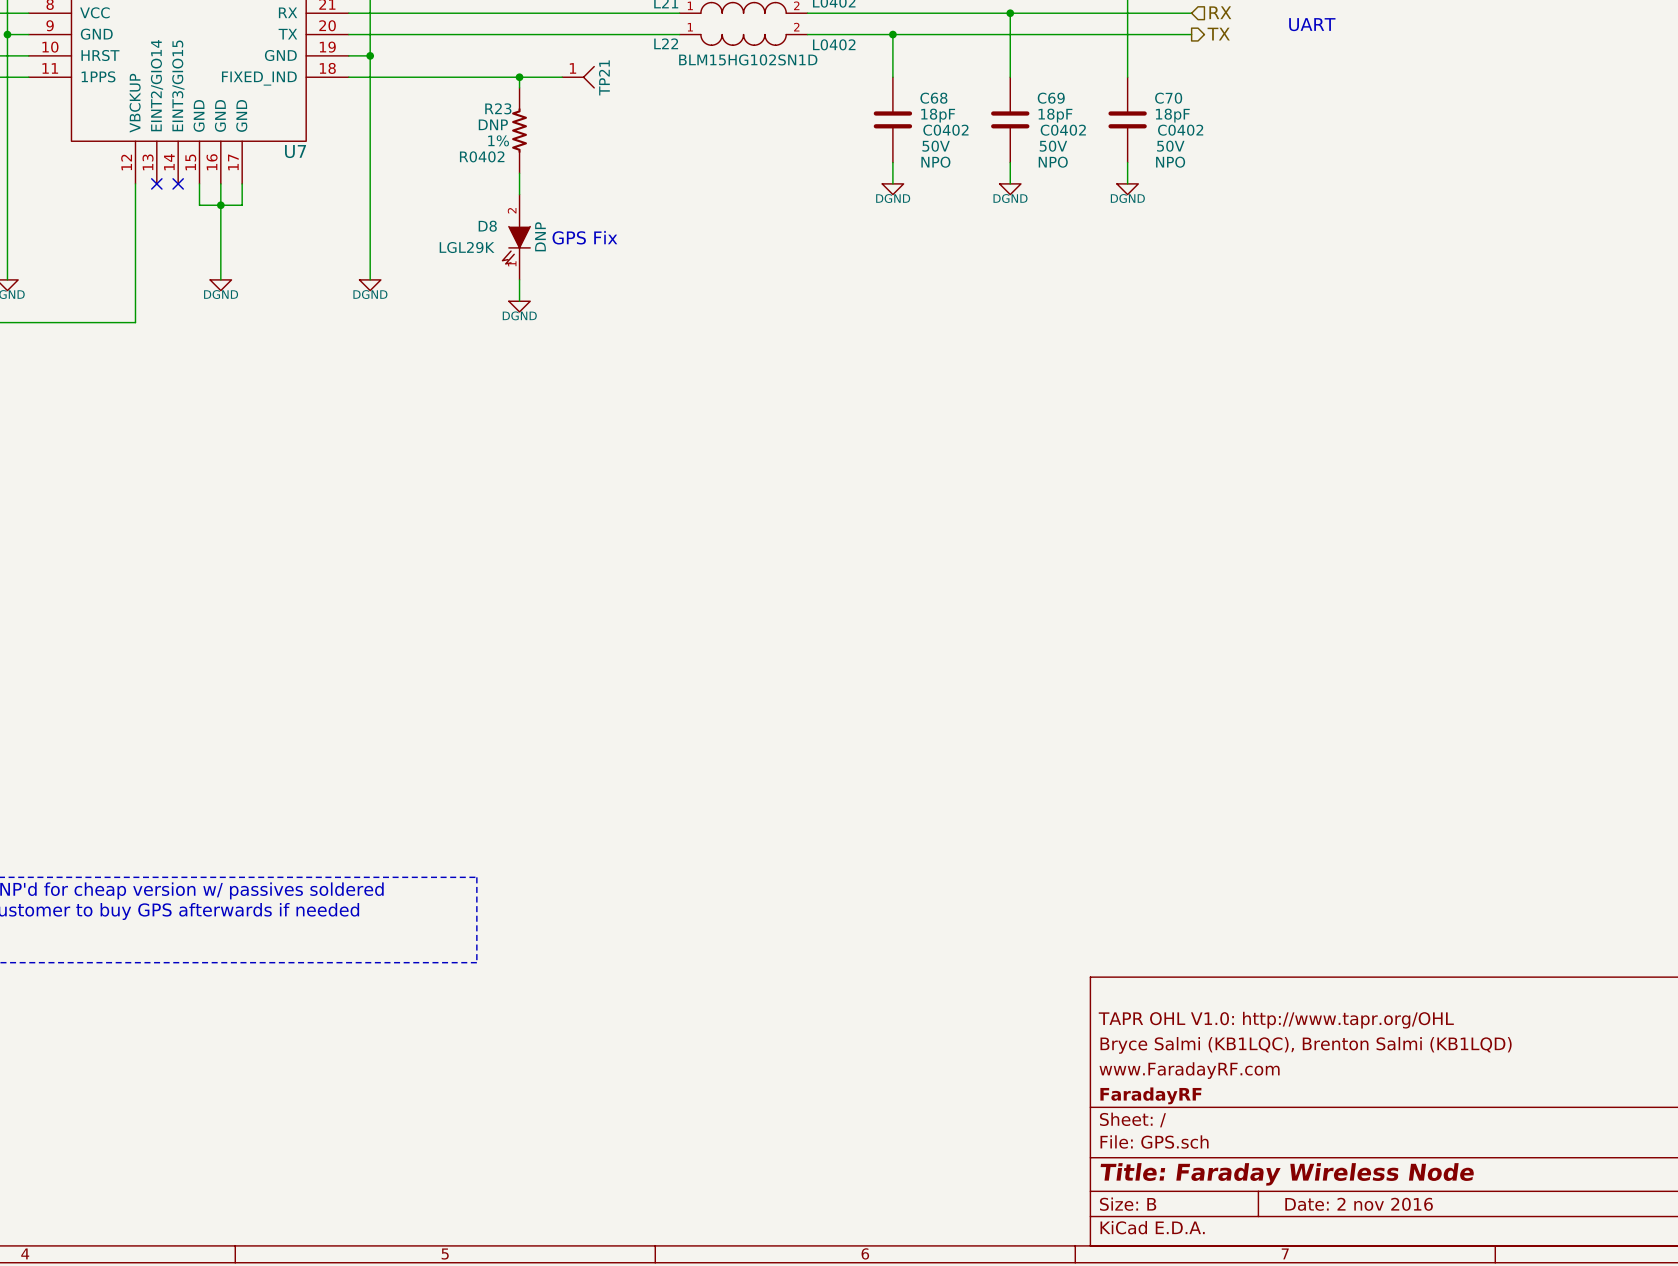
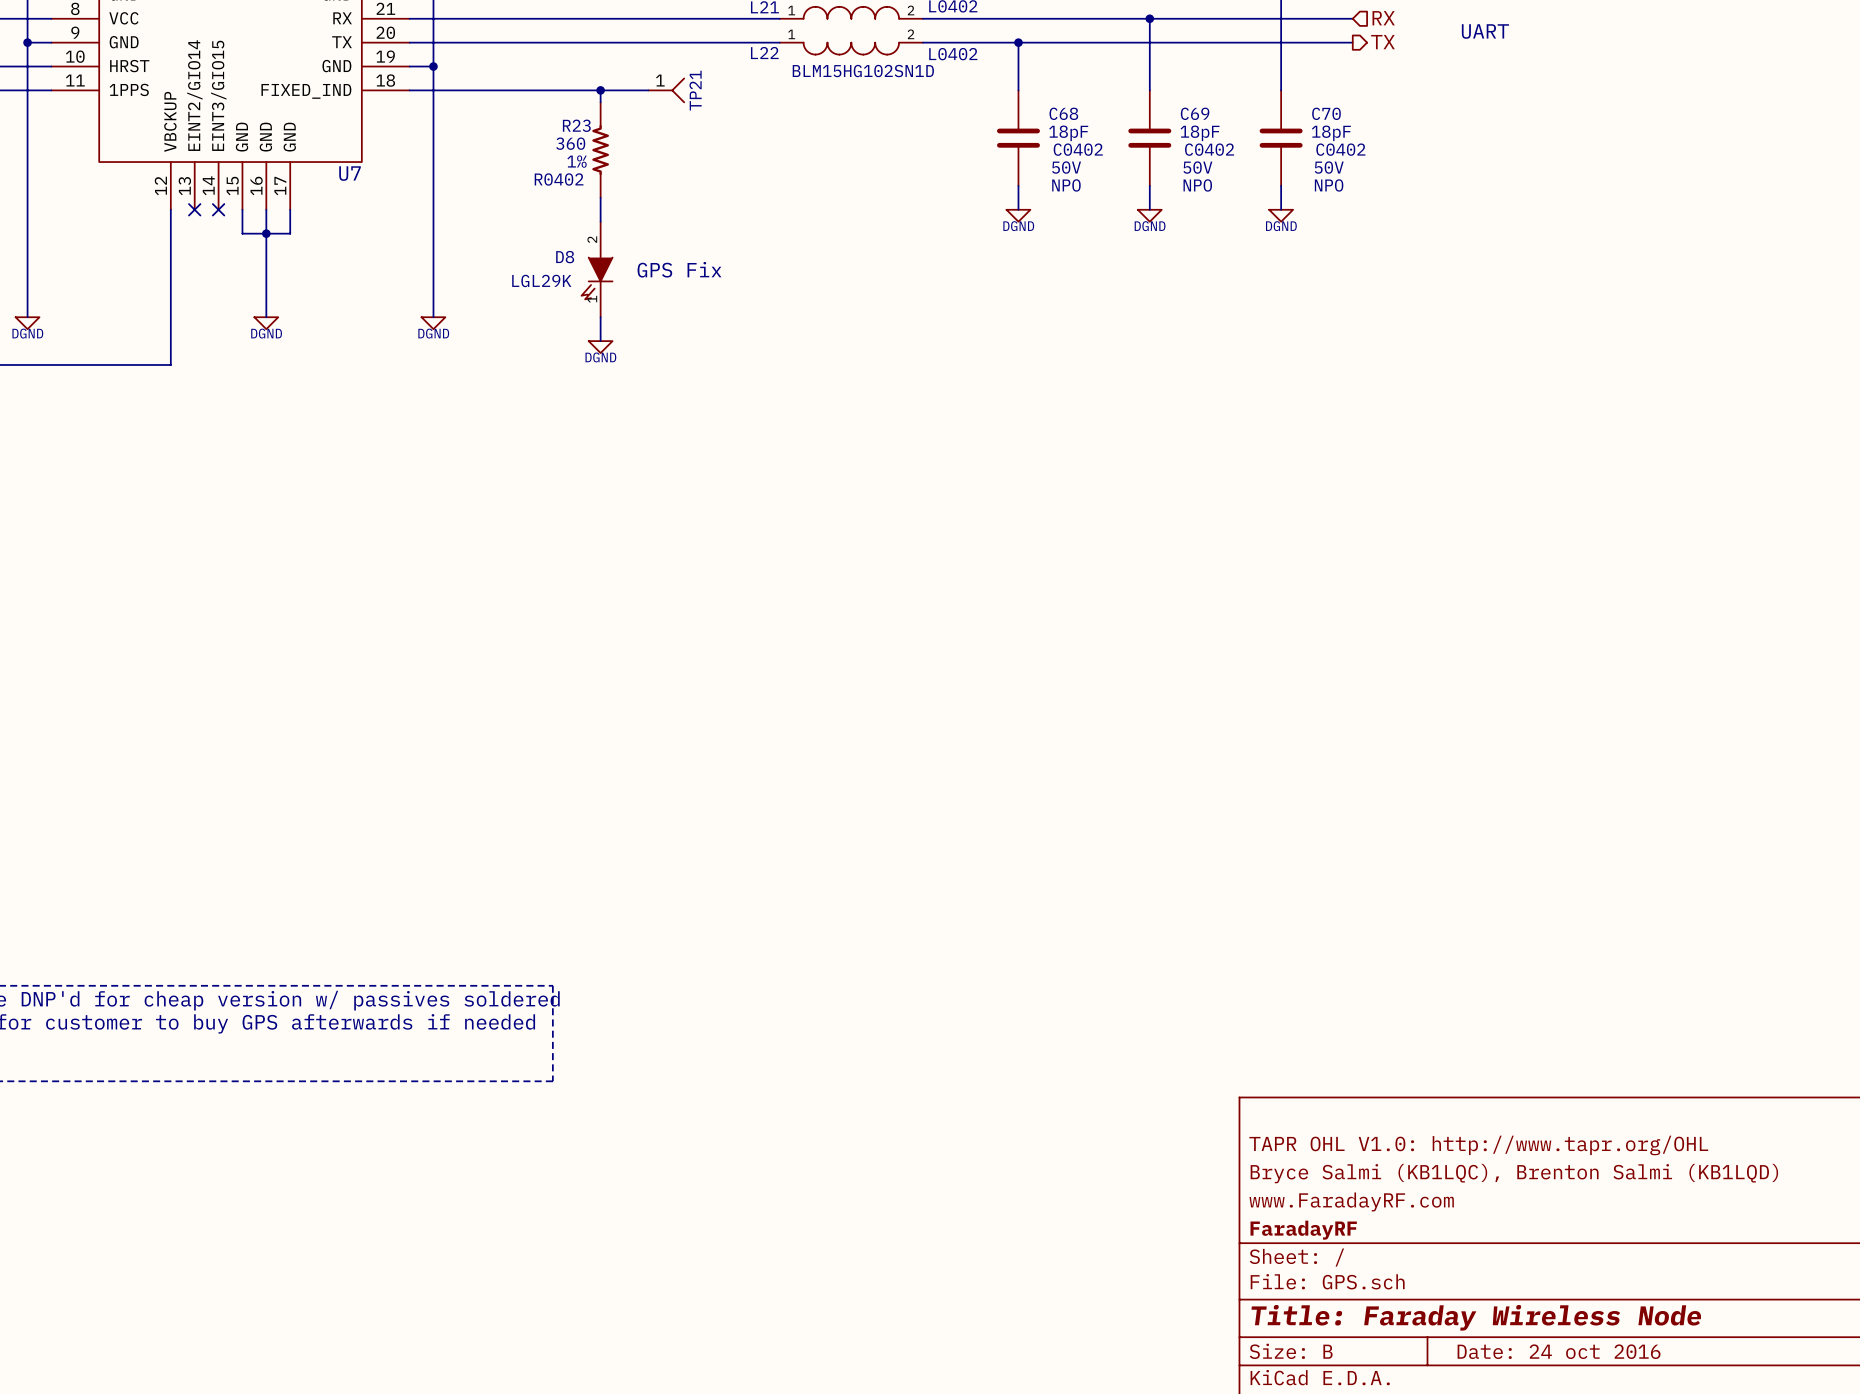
R23 value: DNP (493, 124) -> 360 (570, 143)
D8 value: DNP (540, 236) -> none
title block: Date: 2 nov 2016 (1359, 1204) -> Date: 24 oct 2016 (1559, 1351)

